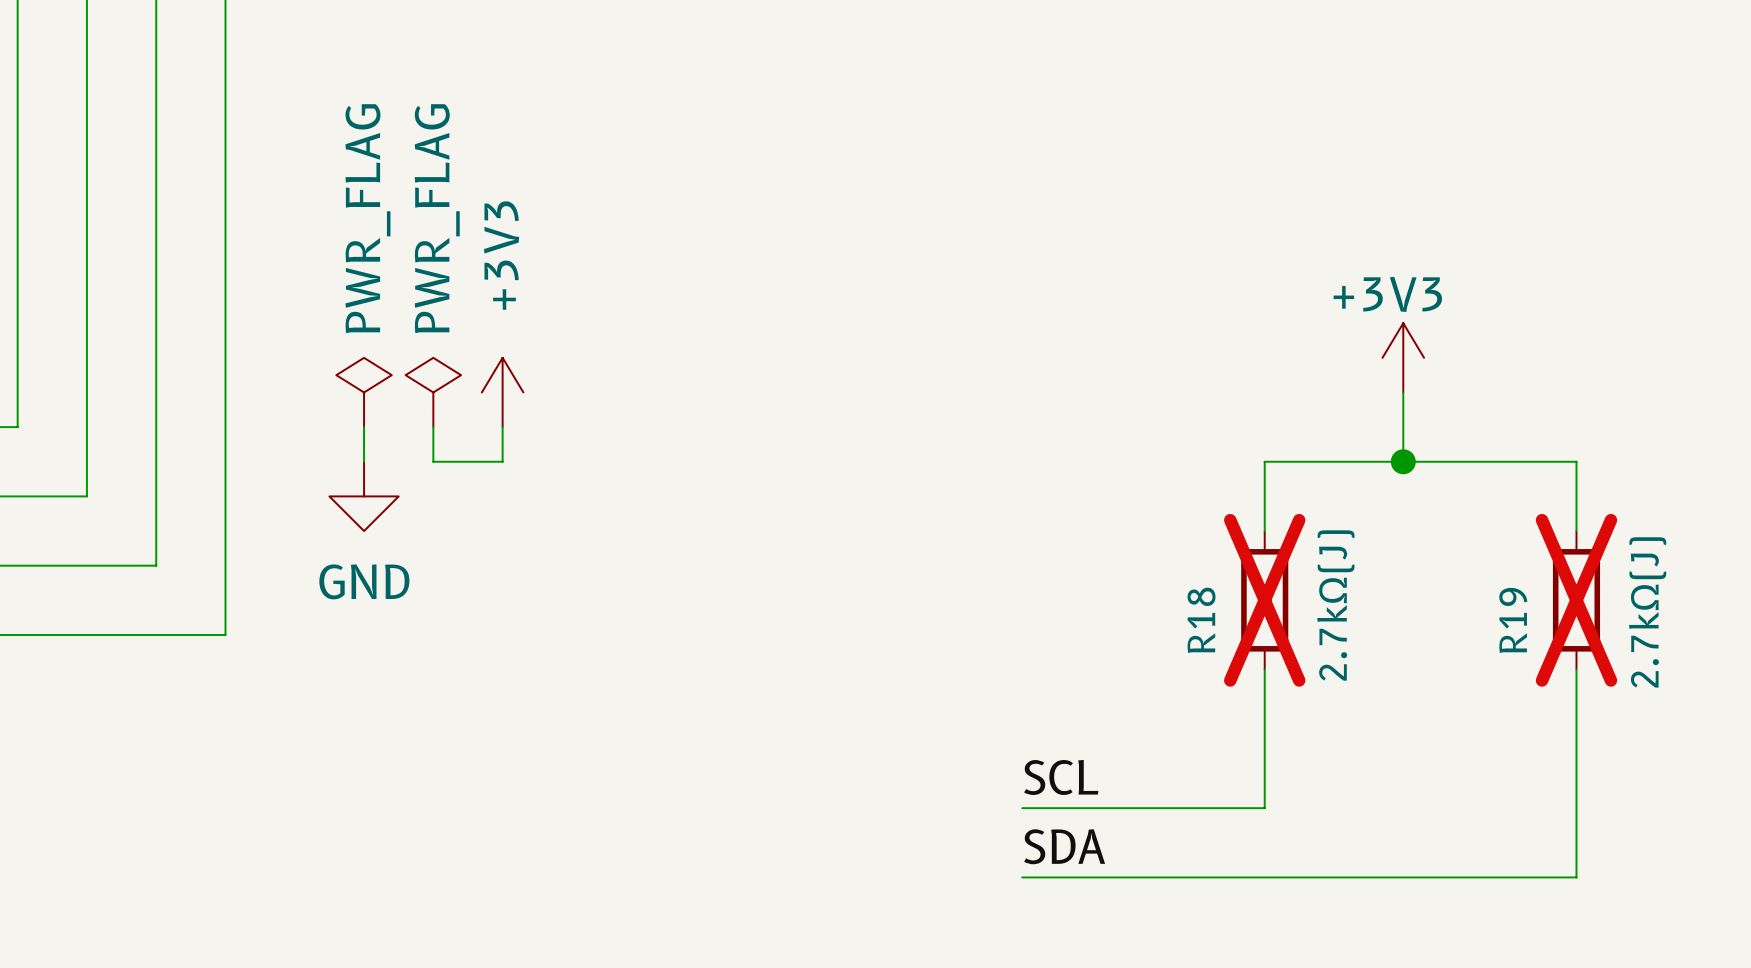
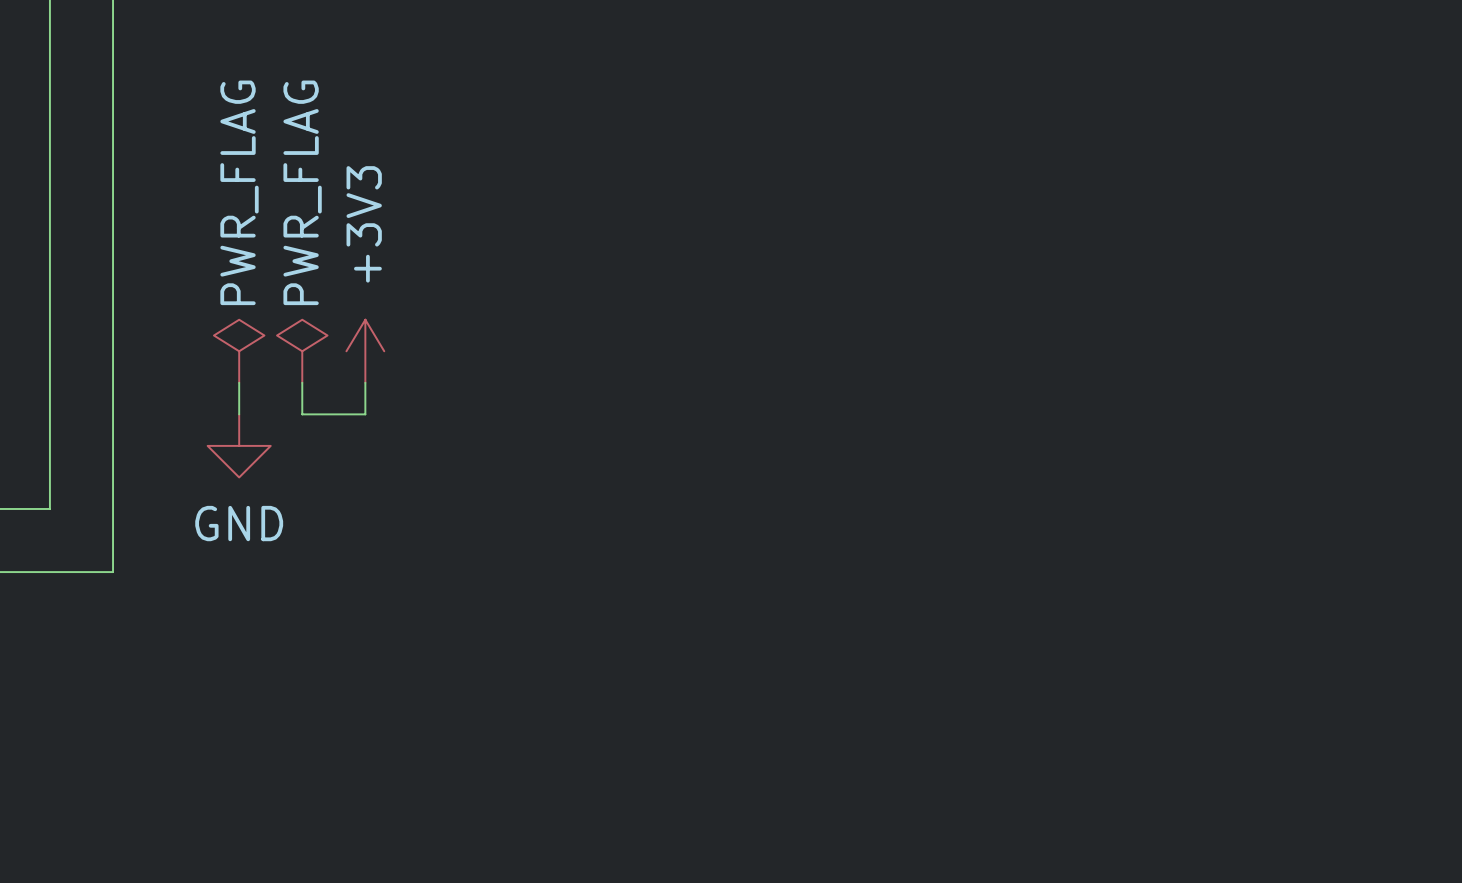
power symbol: +3V3 (1403, 357) -> none
wire: (1403, 392) (1403, 461) -> none
junction: (1403, 461) -> none
wire: (1264, 531) (1264, 461) (1576, 461) (1576, 531) -> none
R18: 2.7kΩ(J) (1264, 600) -> none
R19: 2.7kΩ(J) (1576, 600) -> none
wire: (1264, 669) (1264, 808) (1022, 808) -> none
wire: (1576, 669) (1576, 877) (1022, 877) -> none
label: SCL (1061, 777) -> none
label: SDA (1064, 846) -> none

